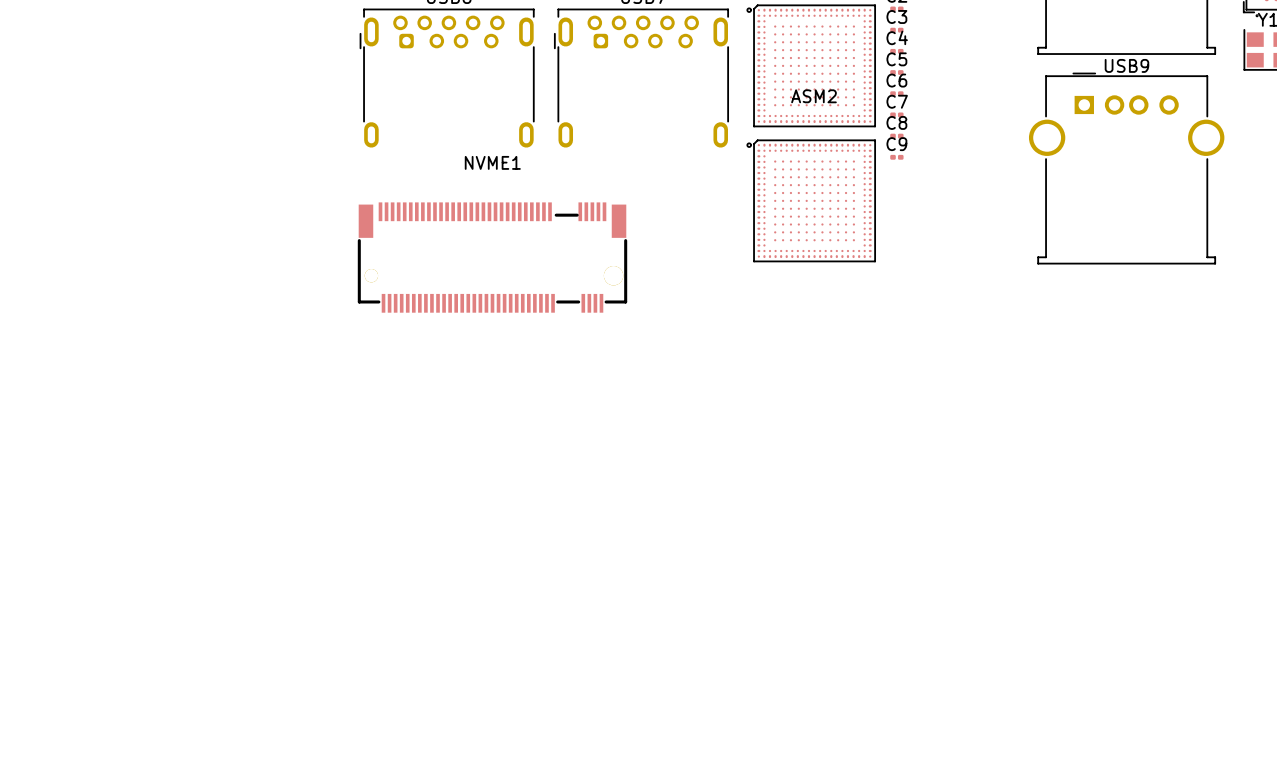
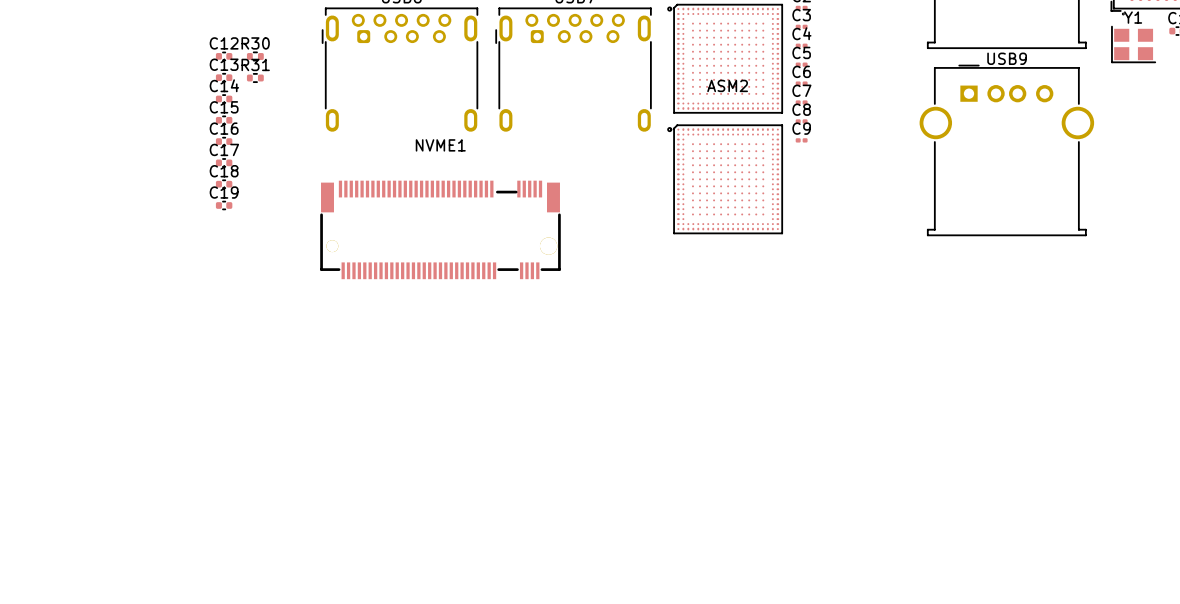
C12: none -> (224, 56)
R30: none -> (255, 56)
C13: none -> (224, 77)
R31: none -> (255, 78)
C14: none -> (224, 98)
C15: none -> (224, 120)
C16: none -> (224, 141)
C17: none -> (224, 162)
C18: none -> (224, 184)
C19: none -> (224, 205)

